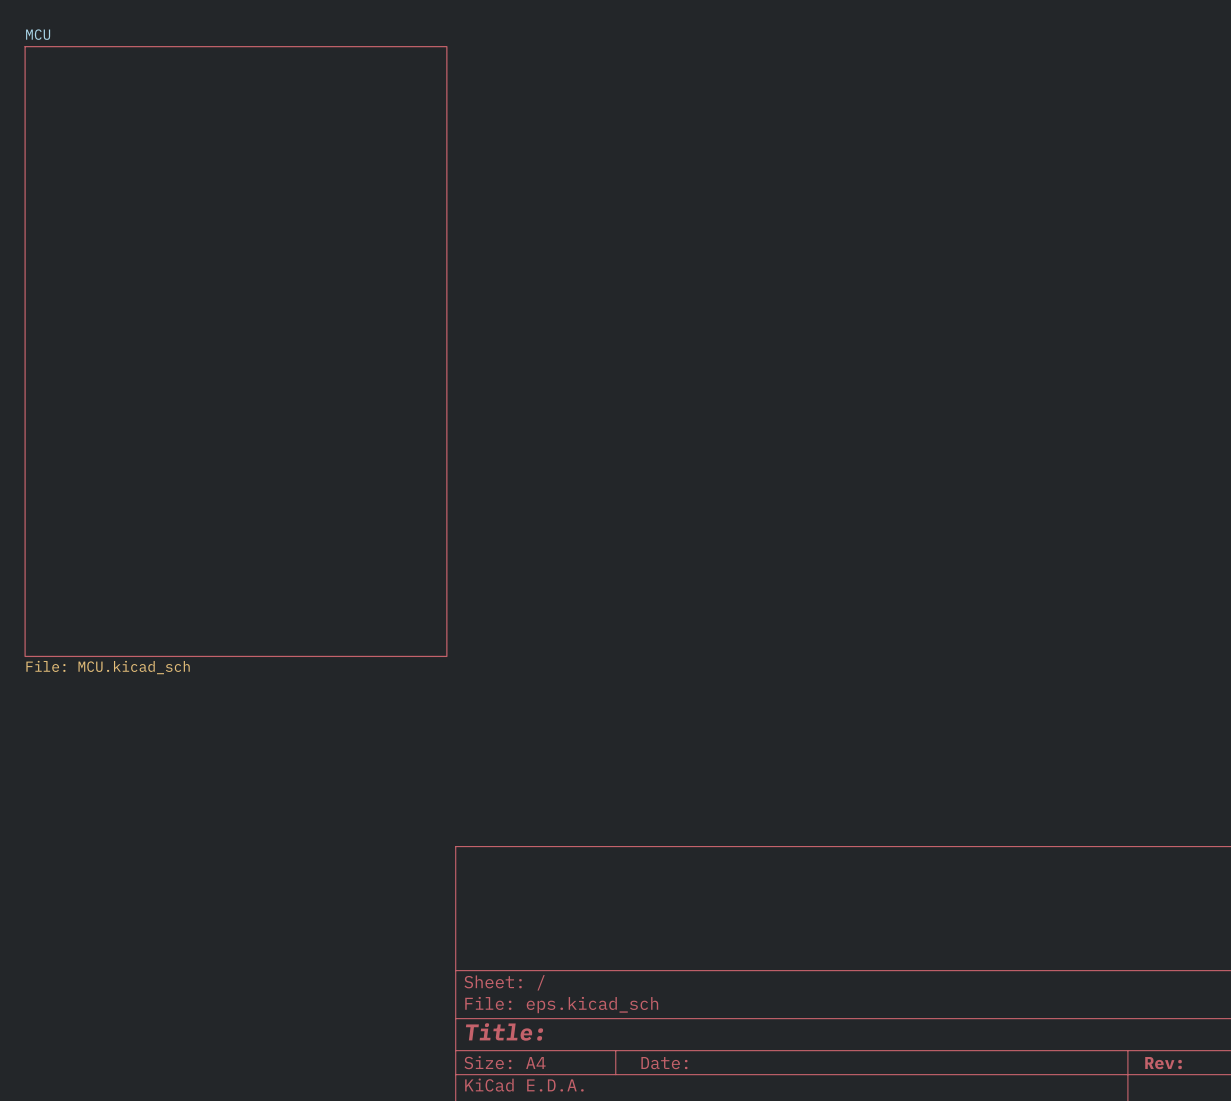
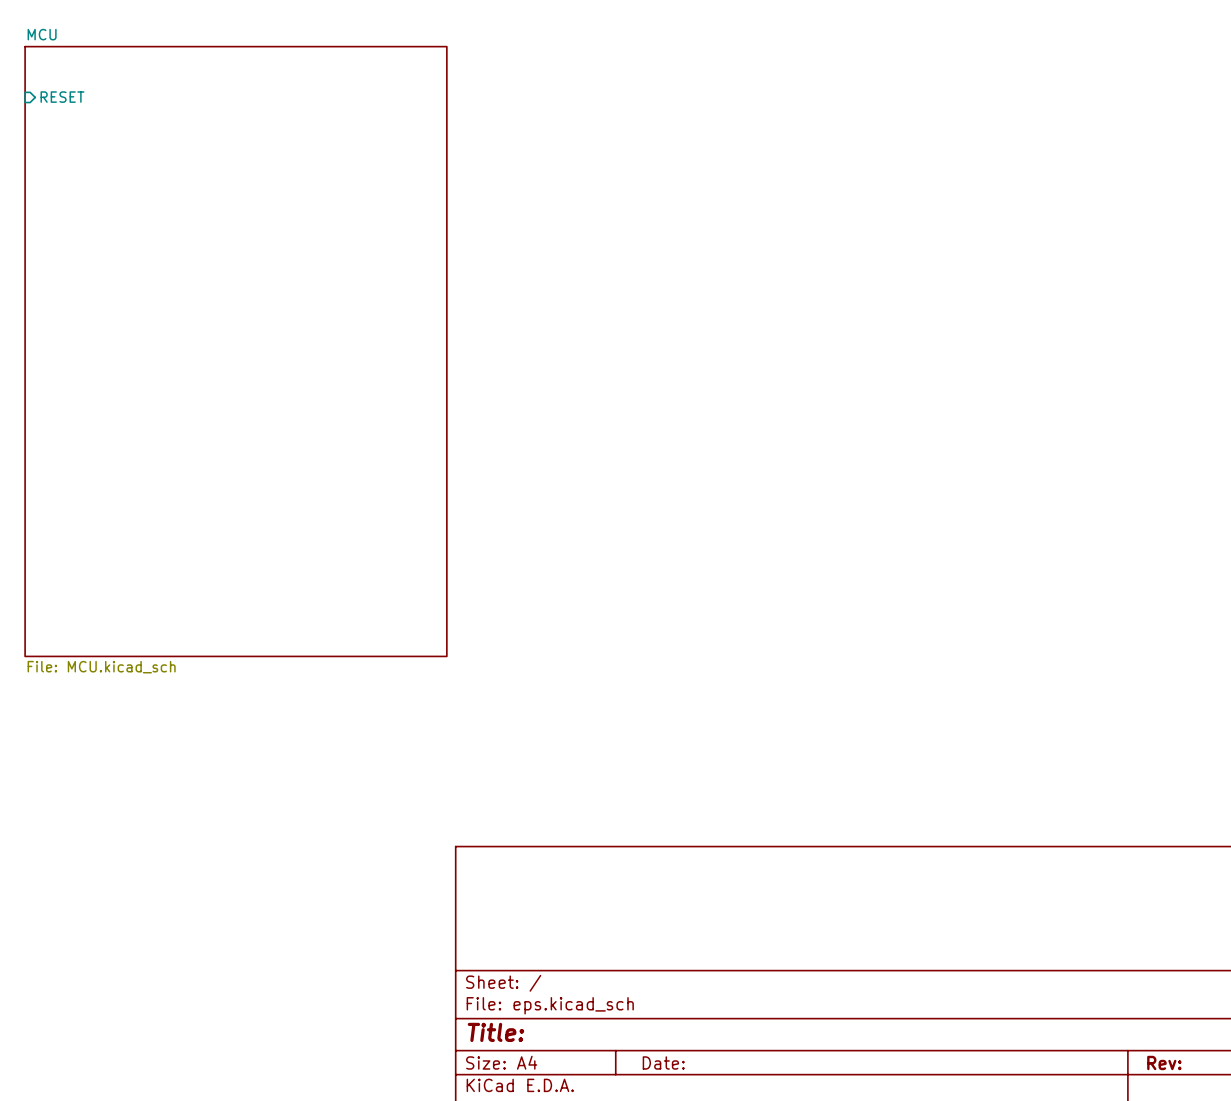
sheet pin: none -> RESET (62, 97)

